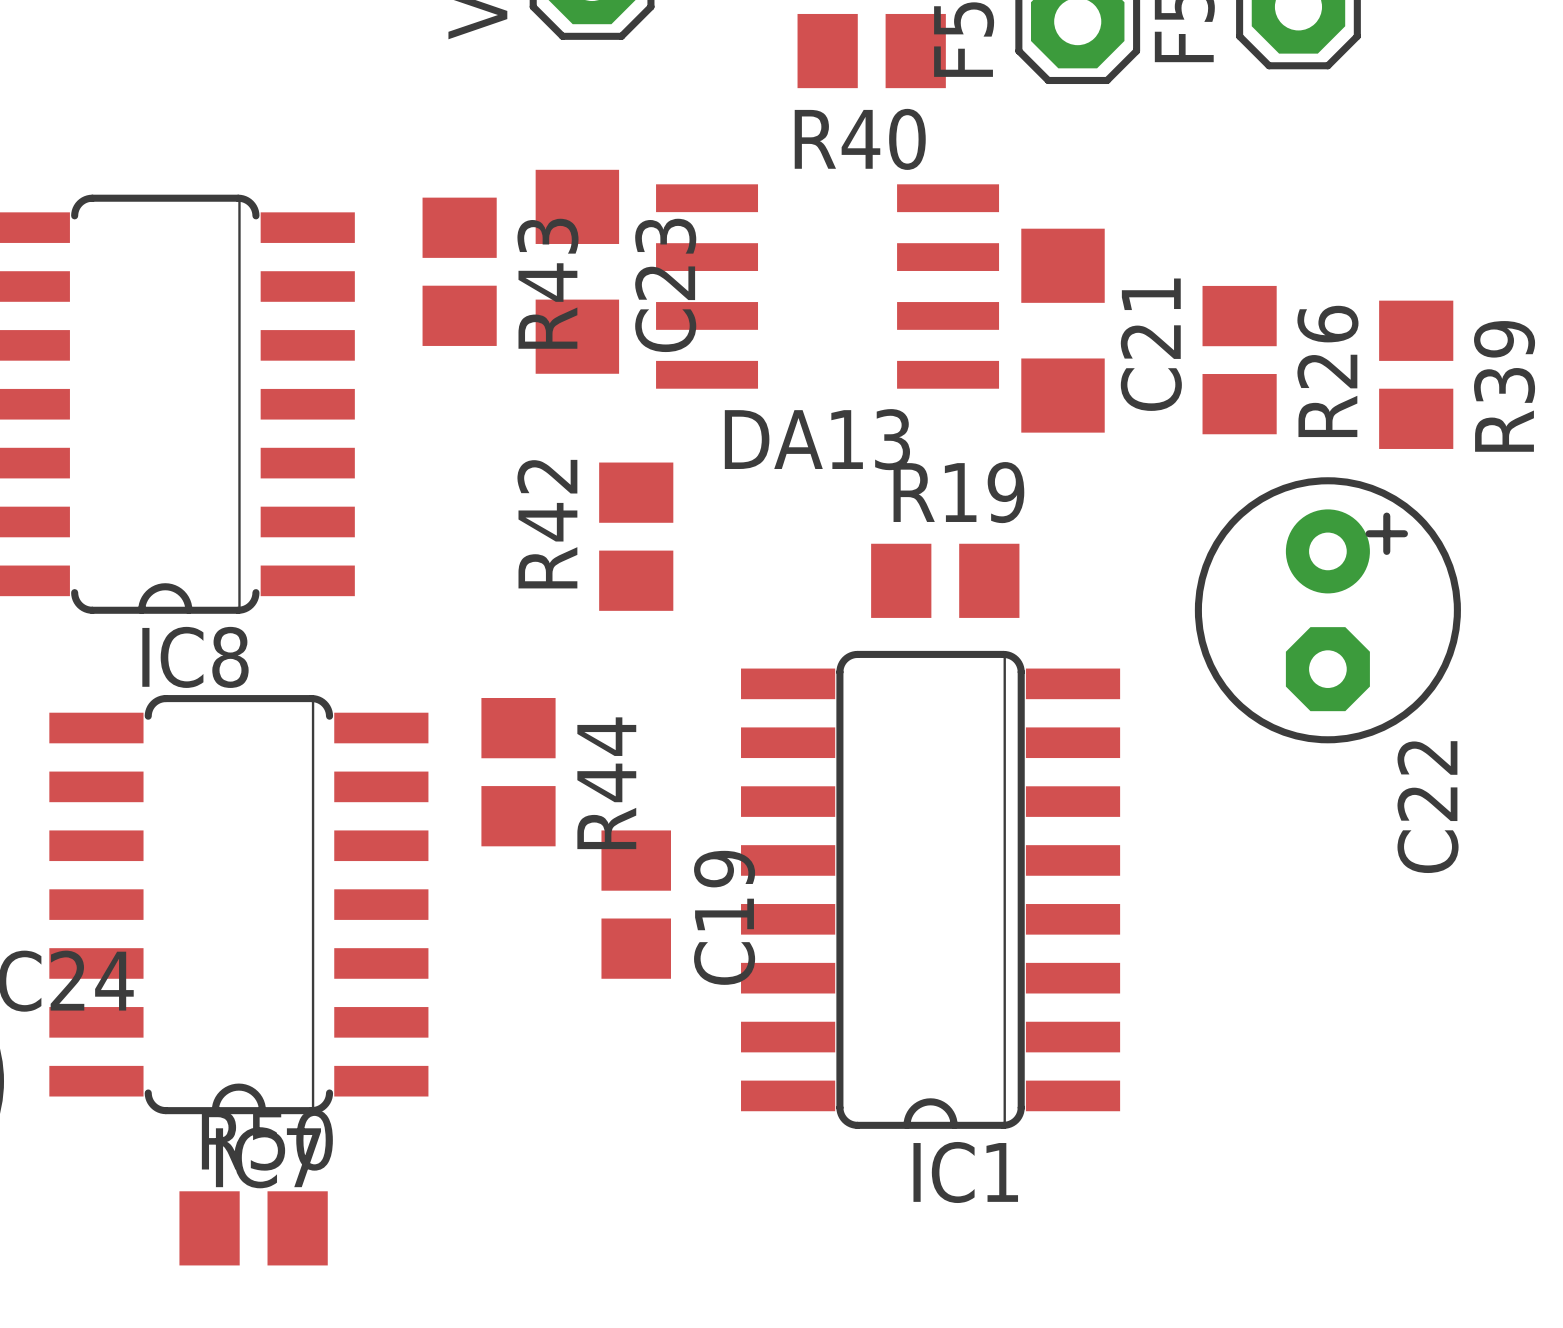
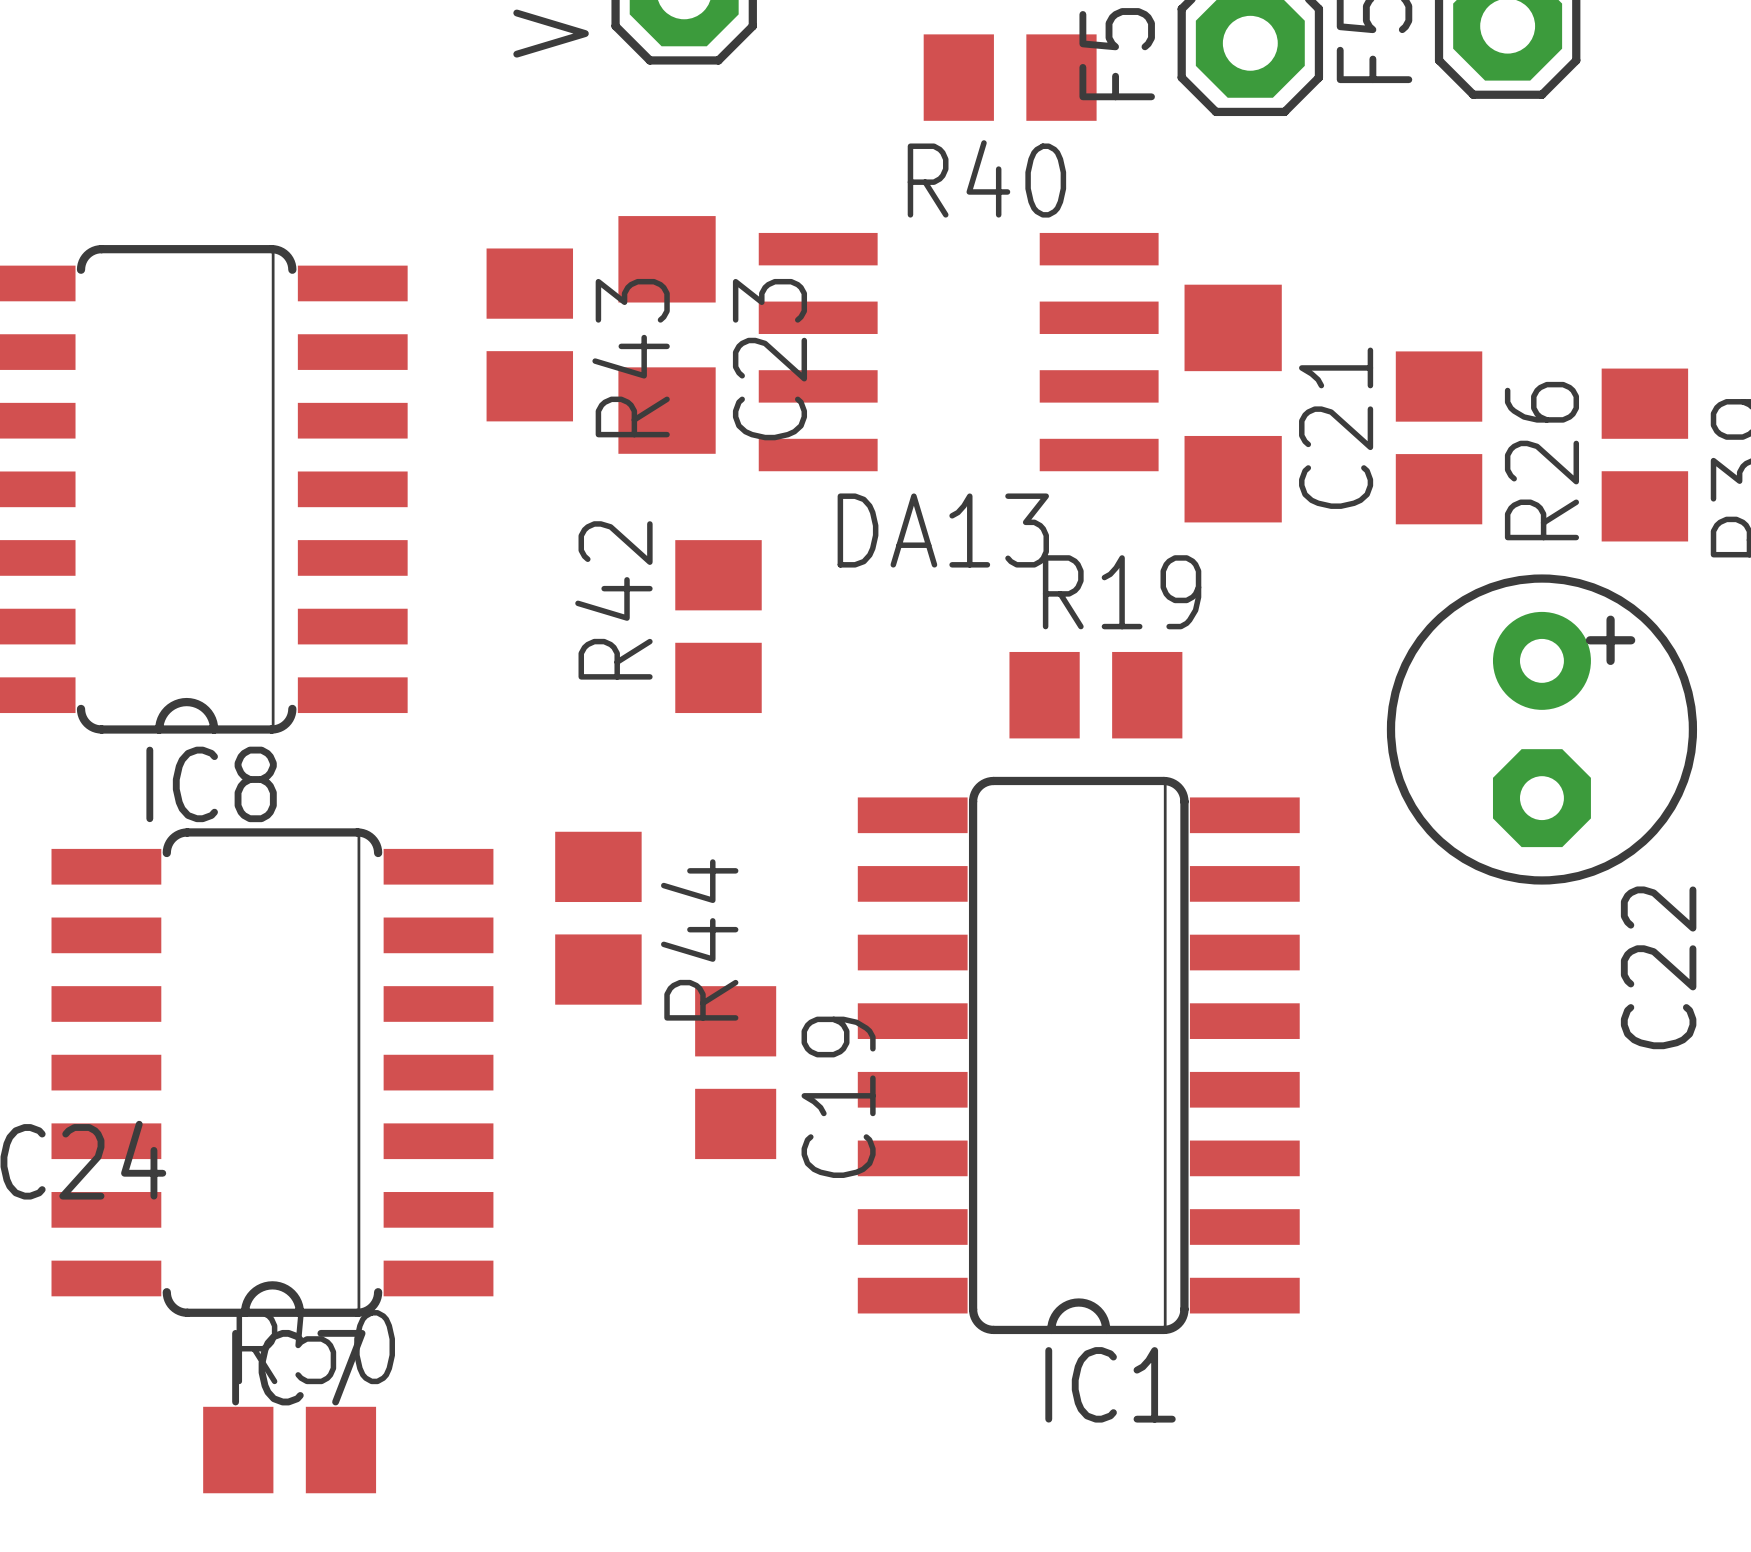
R42 position: (636, 536) -> (718, 626)

